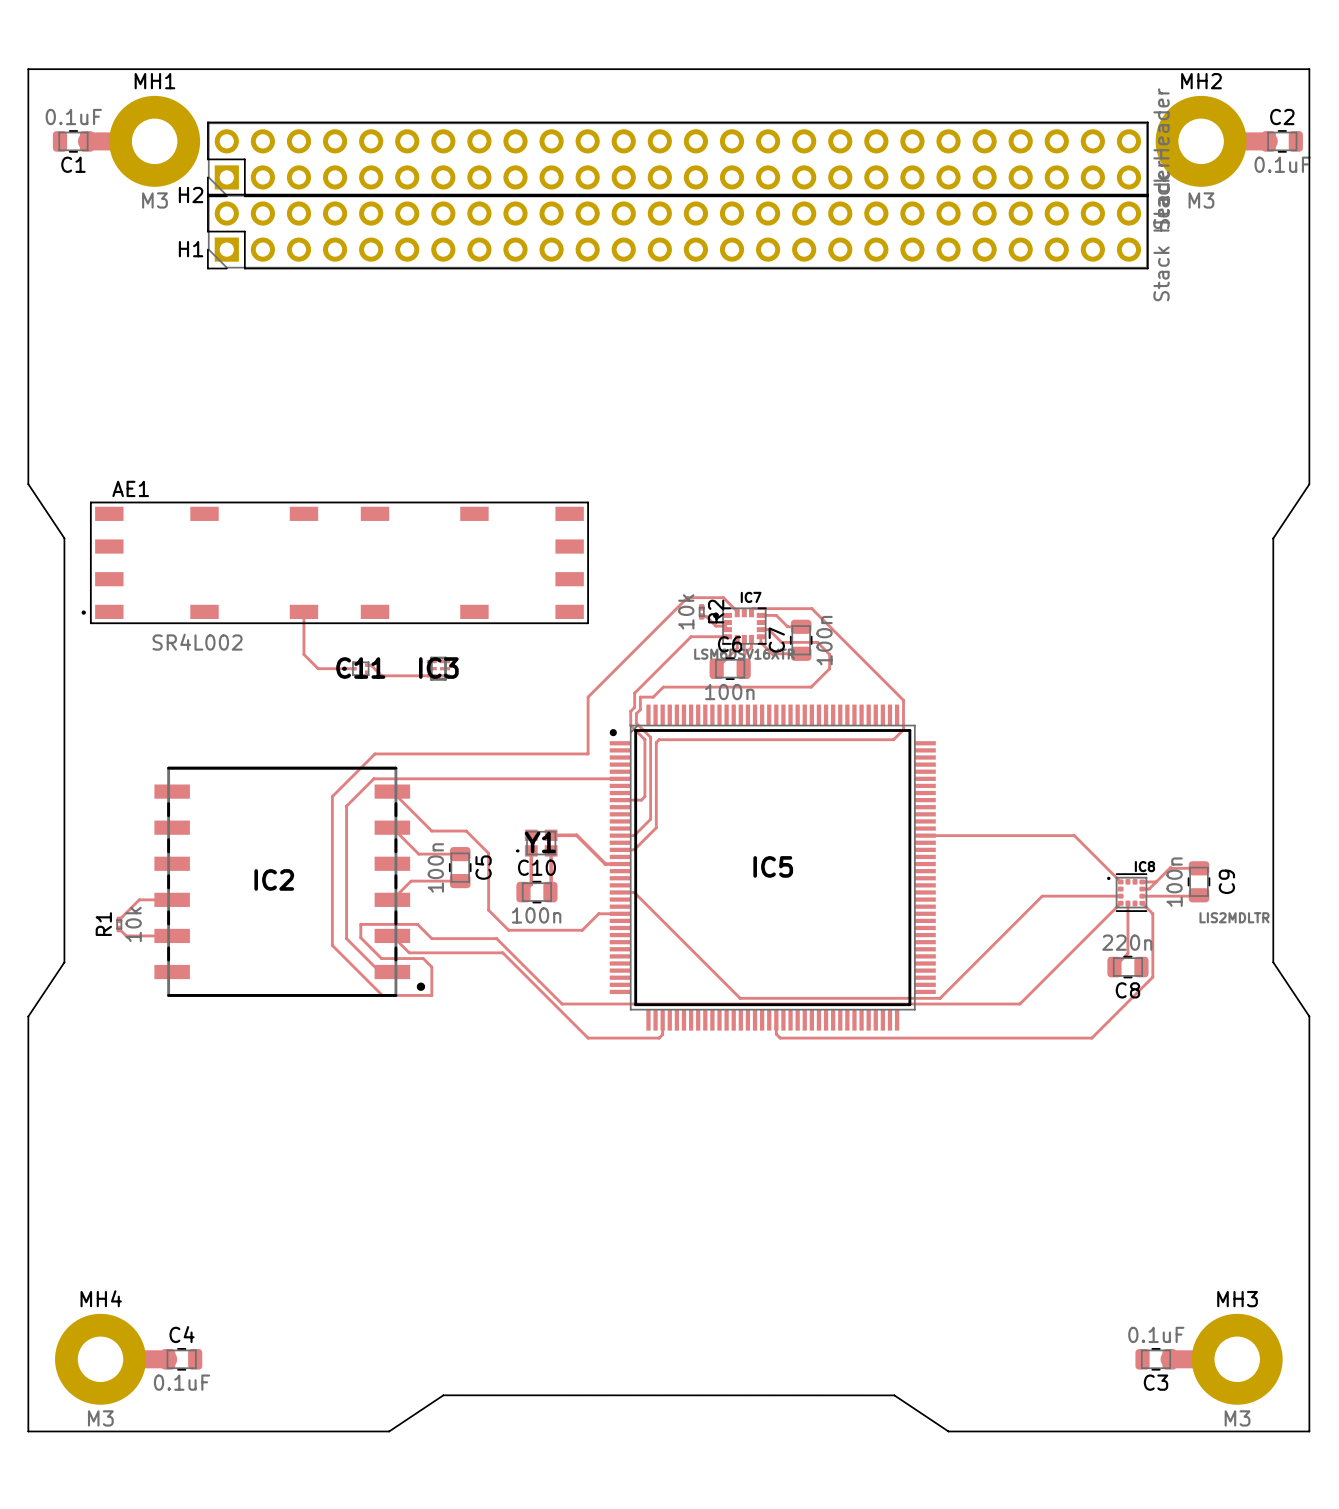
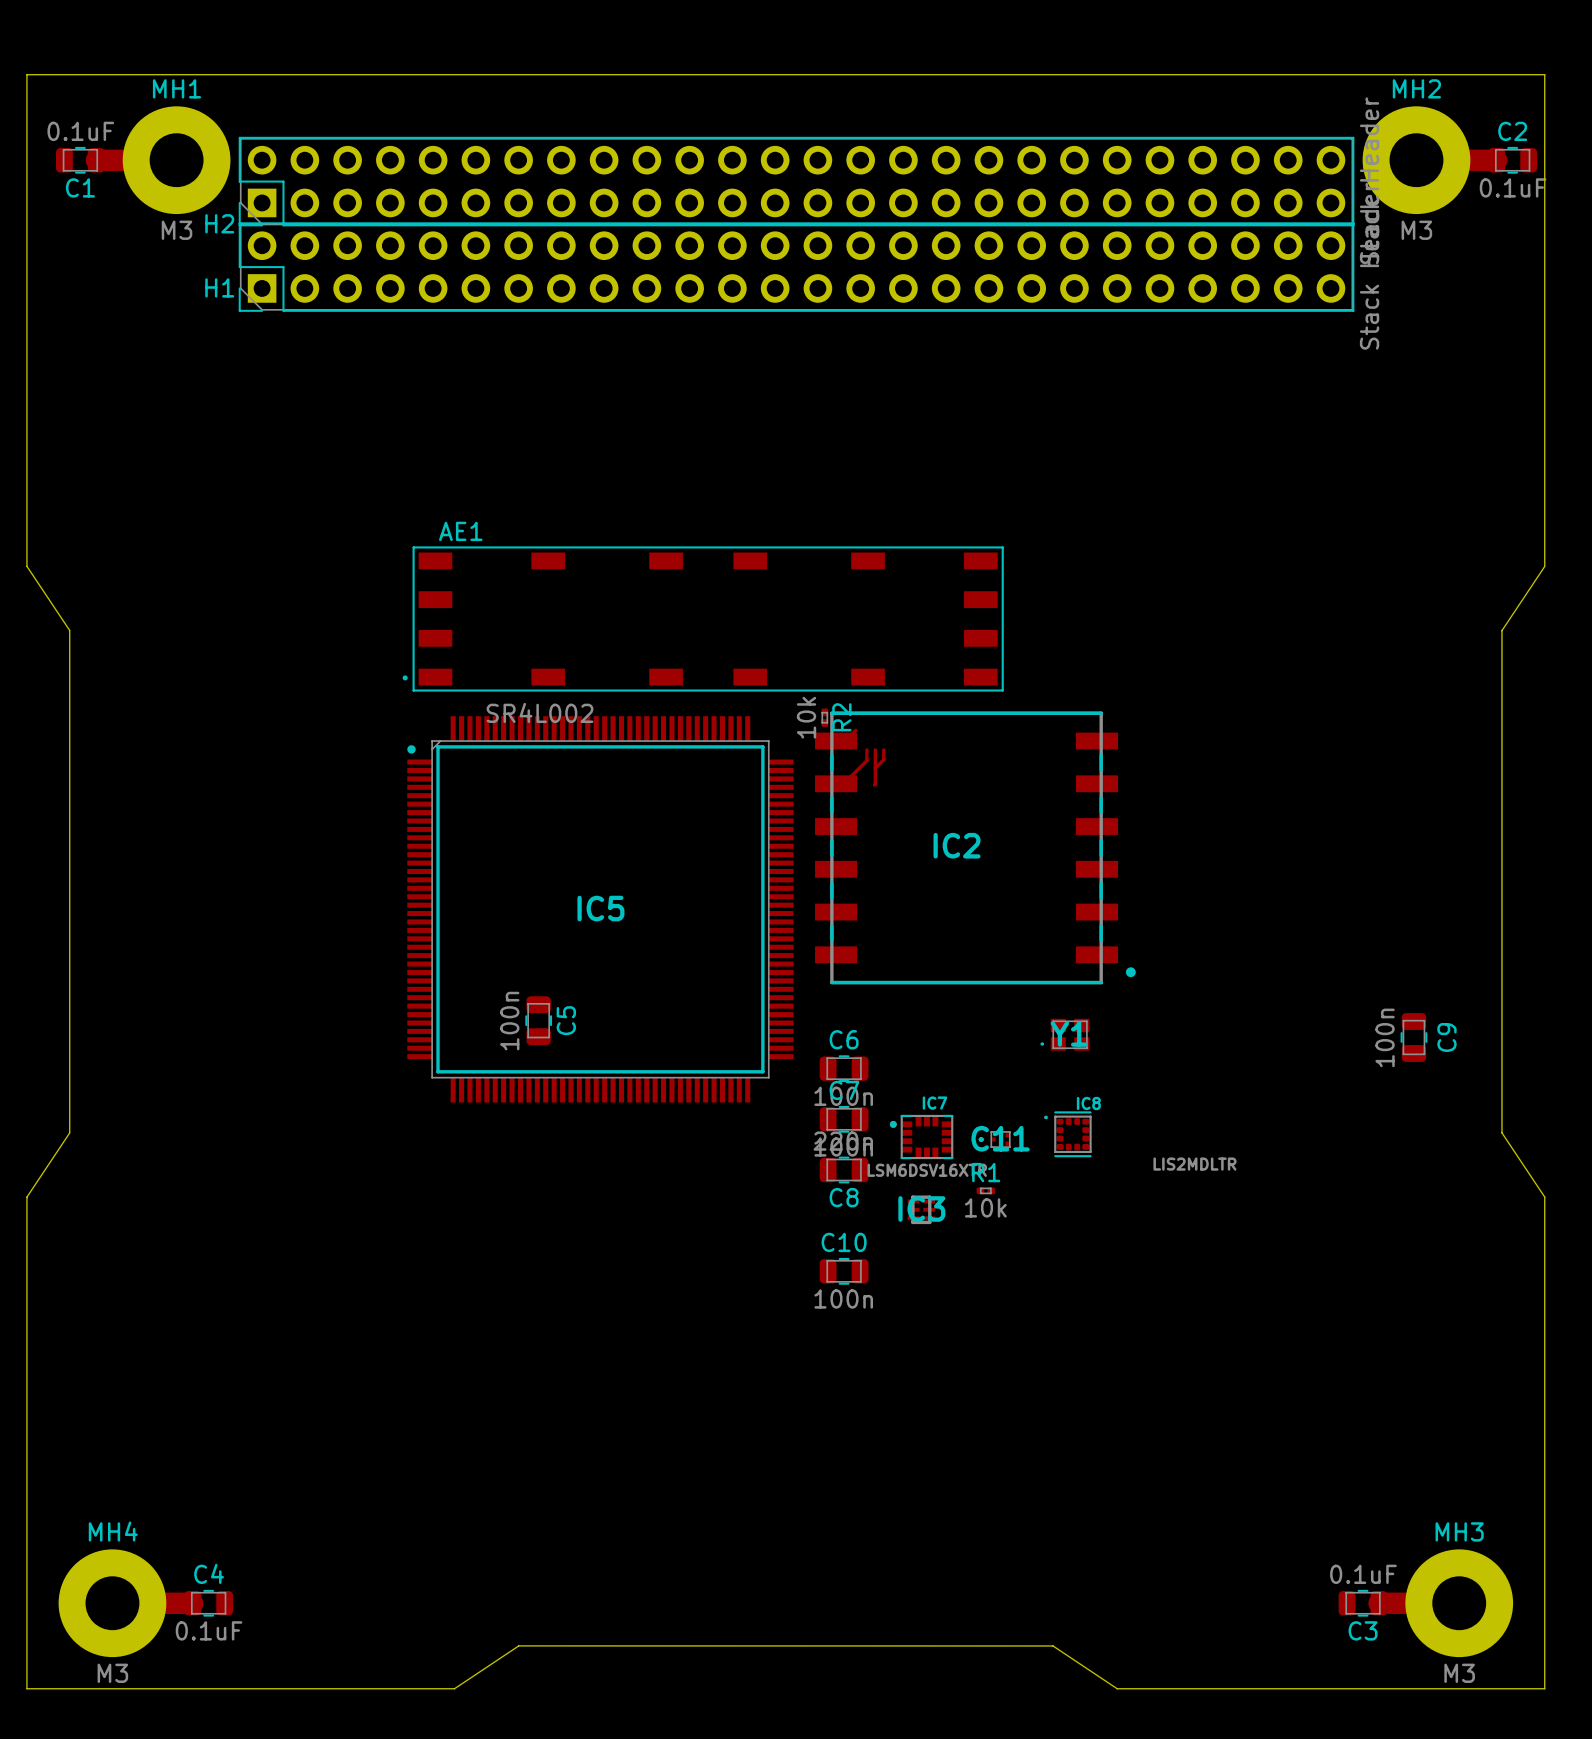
AE1 position: (335, 562) -> (703, 618)
track: (303, 611) (303, 654) (318, 668) (355, 668) -> none
track: (737, 613) (723, 597) (687, 597) (588, 697) (588, 753) (374, 753) (332, 796) (332, 945) (382, 995) (431, 995) (431, 967) (423, 958) (381, 958) (360, 937) (360, 924) (417, 924) (431, 938) (496, 938) (562, 1004) (1019, 1004) (1120, 903) -> none
track: (751, 613) (752, 608) (811, 608) (903, 700) (903, 729) (893, 739) (659, 739) (656, 742) (656, 827) (634, 849) (620, 849) -> none
track: (760, 615) (776, 615) (787, 626) (801, 626) -> none
track: (701, 616) (706, 616) (715, 626) (724, 626) -> none
IC7 position: (739, 626) -> (921, 1137)
track: (760, 629) (768, 629) (781, 642) (817, 642) (829, 654) (829, 668) (811, 687) (663, 687) (653, 697) (640, 697) (640, 709) (636, 713) (636, 723) (650, 737) (650, 819) (634, 835) (620, 835) -> none
track: (727, 636) (691, 636) (634, 693) (634, 707) (630, 711) (630, 725) (644, 739) (644, 796) (641, 800) (620, 800) -> none
track: (760, 636) (760, 642) (772, 654) (801, 653) -> none
C7 rotation: 0° (801, 640) -> 90° clockwise (844, 1119)
C7 position: (801, 640) -> (844, 1119)
track: (366, 665) (371, 665) (381, 675) (431, 675) -> none
C11 position: (355, 668) -> (994, 1139)
IC3 position: (434, 668) -> (916, 1209)
C6 position: (730, 668) -> (844, 1068)
track: (620, 778) (373, 778) (346, 806) (346, 938) (379, 972) (392, 972) -> none
track: (392, 791) (431, 831) (466, 831) (488, 853) (488, 910) (508, 930) (582, 930) (598, 913) (620, 913) -> none
track: (392, 827) (418, 854) (460, 854) -> none
track: (551, 835) (576, 835) (605, 864) (620, 864) -> none
track: (925, 835) (1074, 835) (1120, 881) -> none
Y1 position: (536, 843) -> (1065, 1034)
track: (531, 850) (531, 884) (523, 892) -> none
track: (551, 850) (551, 891) (546, 887) -> none
IC5 position: (772, 867) -> (600, 909)
track: (1198, 868) (1170, 867) (1149, 889) (1142, 889) -> none
IC2 position: (289, 881) -> (975, 847)
track: (460, 881) (411, 881) (392, 899) -> none
track: (1142, 881) (1156, 881) -> none
C10 position: (536, 892) -> (844, 1271)
track: (620, 892) (634, 892) (740, 998) (940, 998) (1042, 896) (1120, 896) -> none
IC8 position: (1127, 892) -> (1067, 1134)
track: (1198, 895) (1142, 896) -> none
track: (172, 899) (139, 899) (119, 919) -> none
track: (1127, 903) (1127, 953) (1114, 967) -> none
track: (1142, 903) (1152, 913) (1152, 977) (1091, 1038) (780, 1038) (776, 1034) (776, 1020) -> none
R1 rotation: 0° (119, 924) -> 90° clockwise (985, 1190)
R1 position: (119, 924) -> (985, 1190)
track: (119, 928) (126, 935) (172, 935) -> none
track: (392, 935) (409, 952) (502, 952) (588, 1038) (659, 1038) (662, 1034) (662, 1020) -> none
C8 position: (1127, 967) -> (844, 1170)

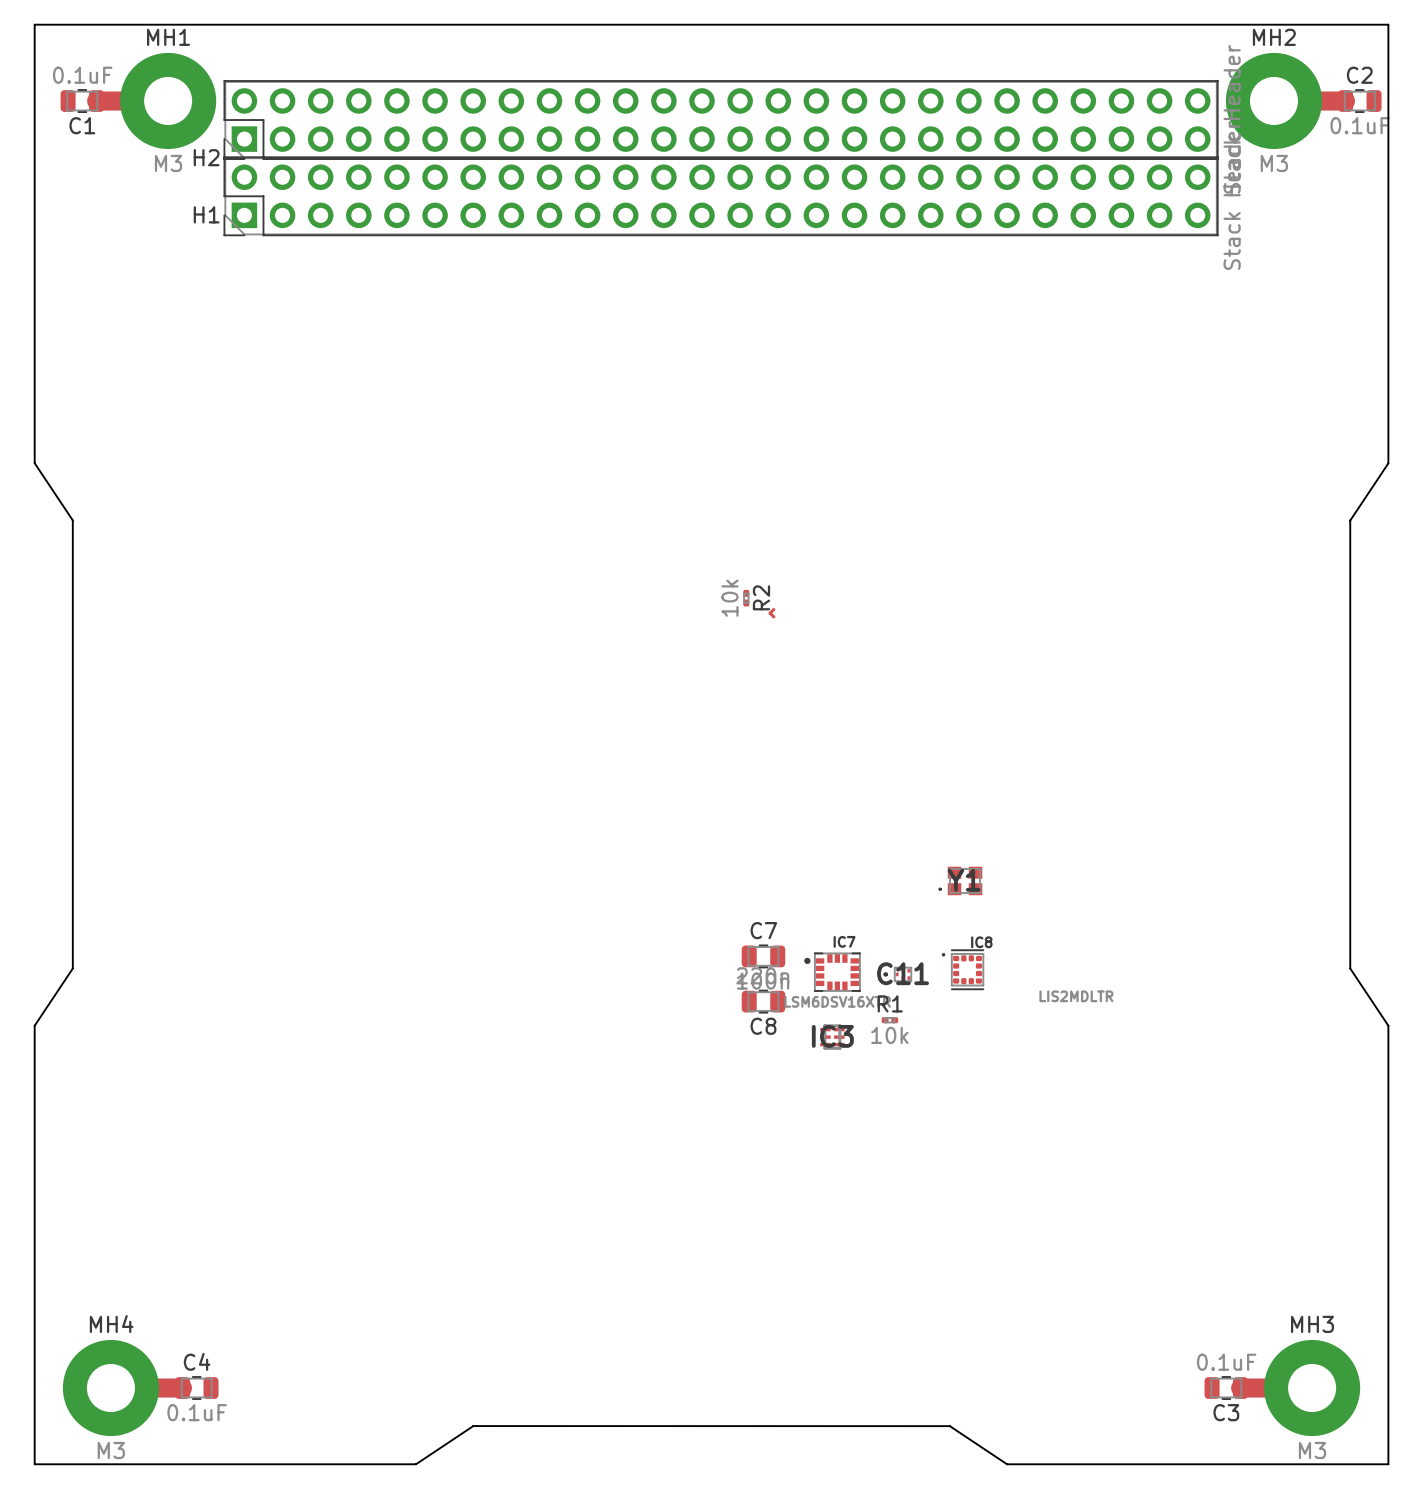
AE1: SR4L002 (703, 618) -> none
track: (866, 749) (866, 760) (842, 785) -> none
track: (875, 749) (874, 785) -> none
track: (883, 749) (883, 759) (875, 768) -> none
IC2: (975, 847) -> none
IC5: (600, 909) -> none
C5: 100n (538, 1020) -> none
C9: 100n (1413, 1037) -> none
C6: 100n (844, 1068) -> none
C10: 100n (844, 1271) -> none

